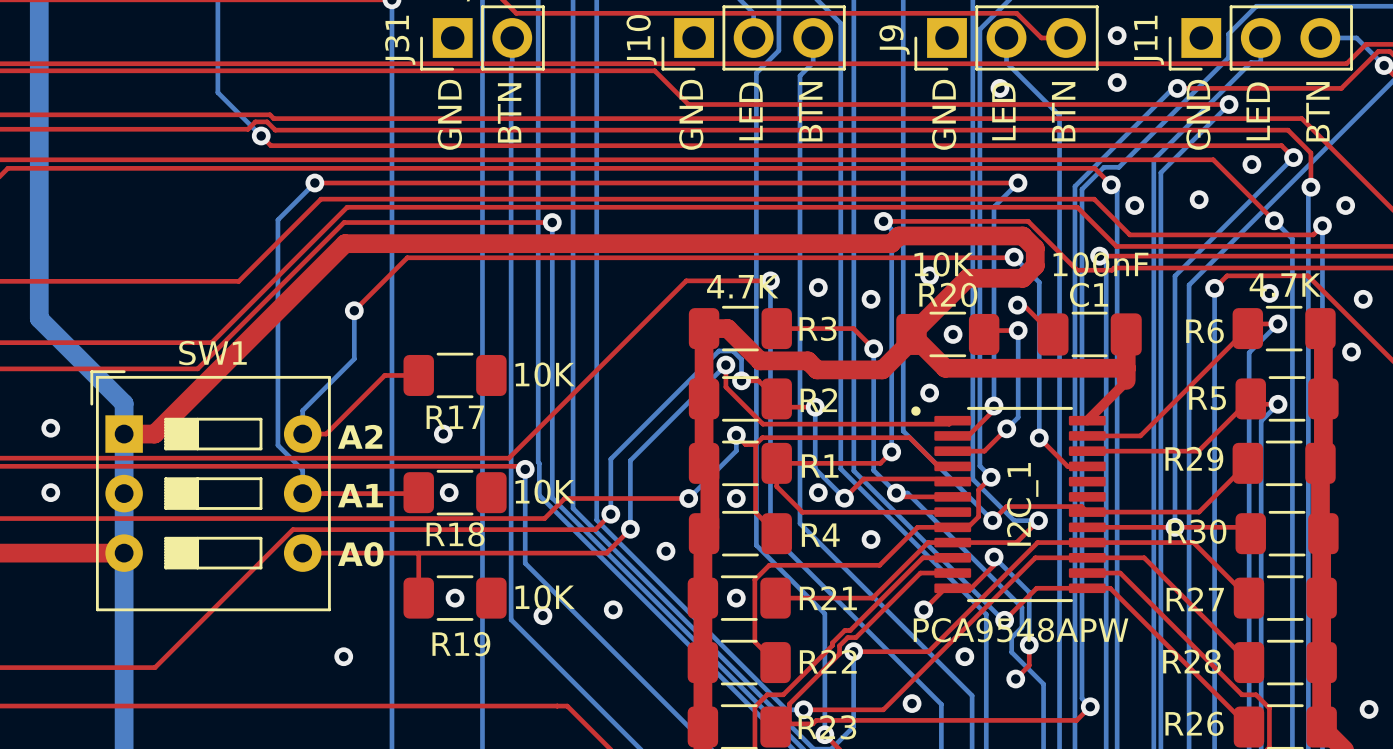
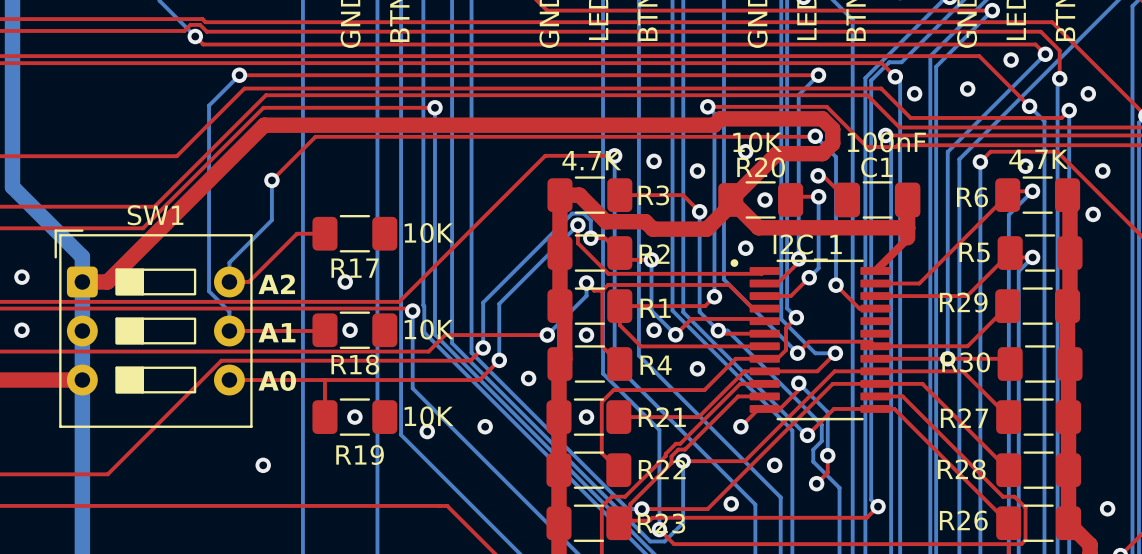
SW1 footprint: [90, 370, 331, 612] -> [54, 229, 253, 428]
I2C_1 name rotation: 0° (1022, 504) -> 90° clockwise (807, 247)
I2C_1 value: PCA9548APW (1021, 630) -> none

